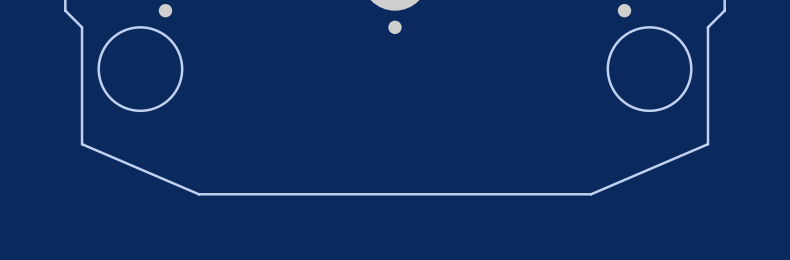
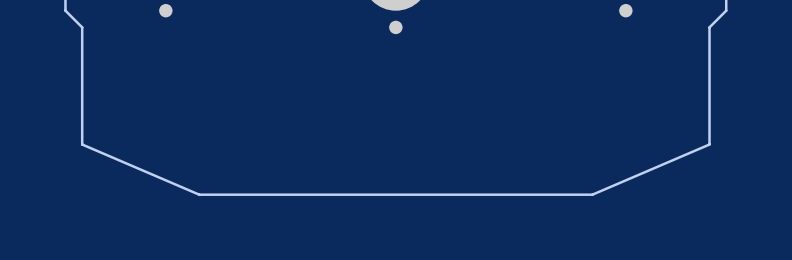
round board edge: [97, 26, 184, 113] -> none
round board edge: [606, 26, 693, 113] -> none

